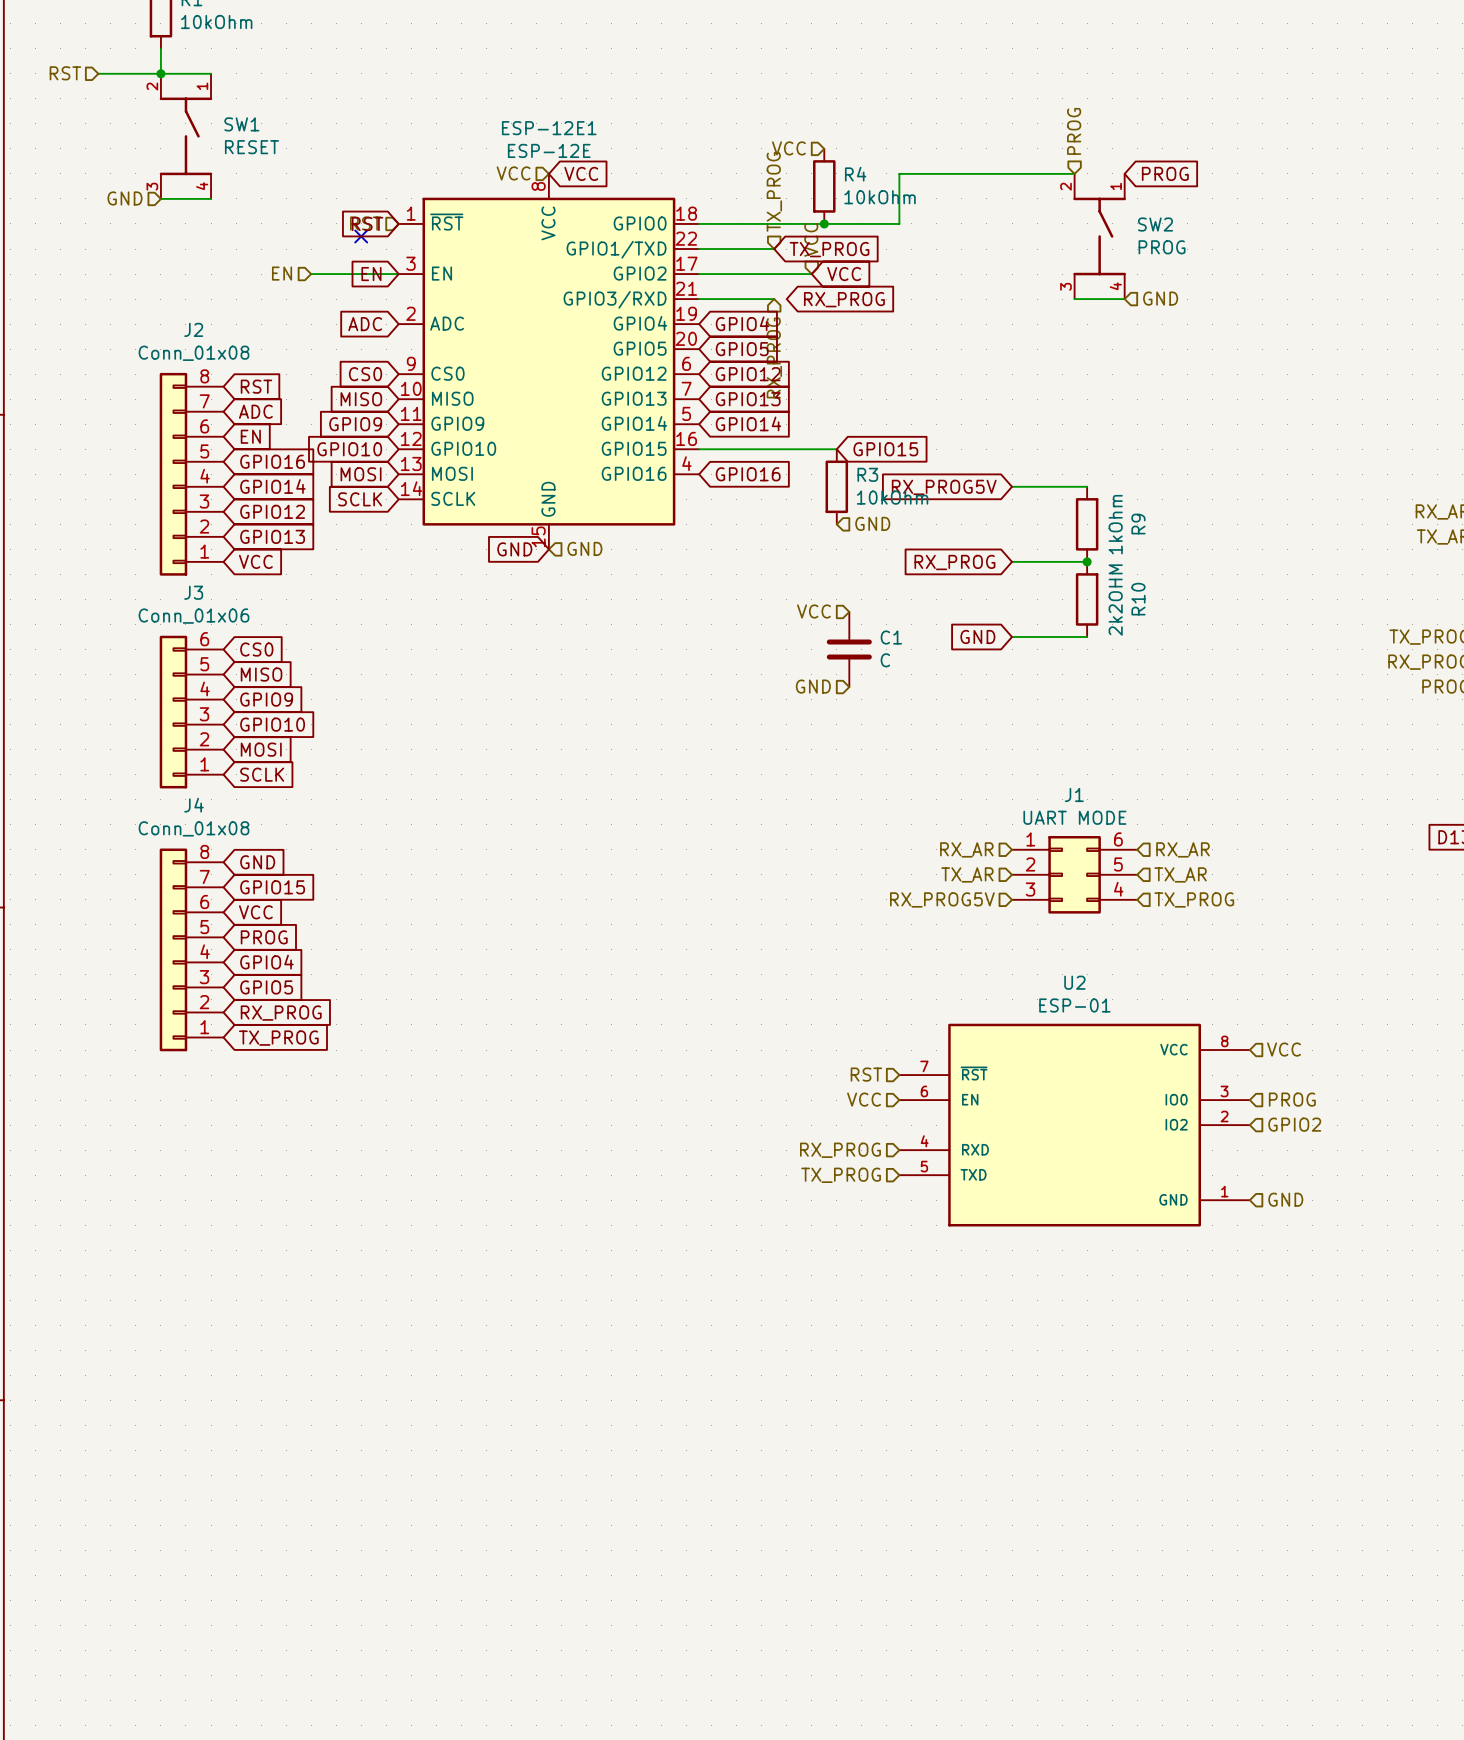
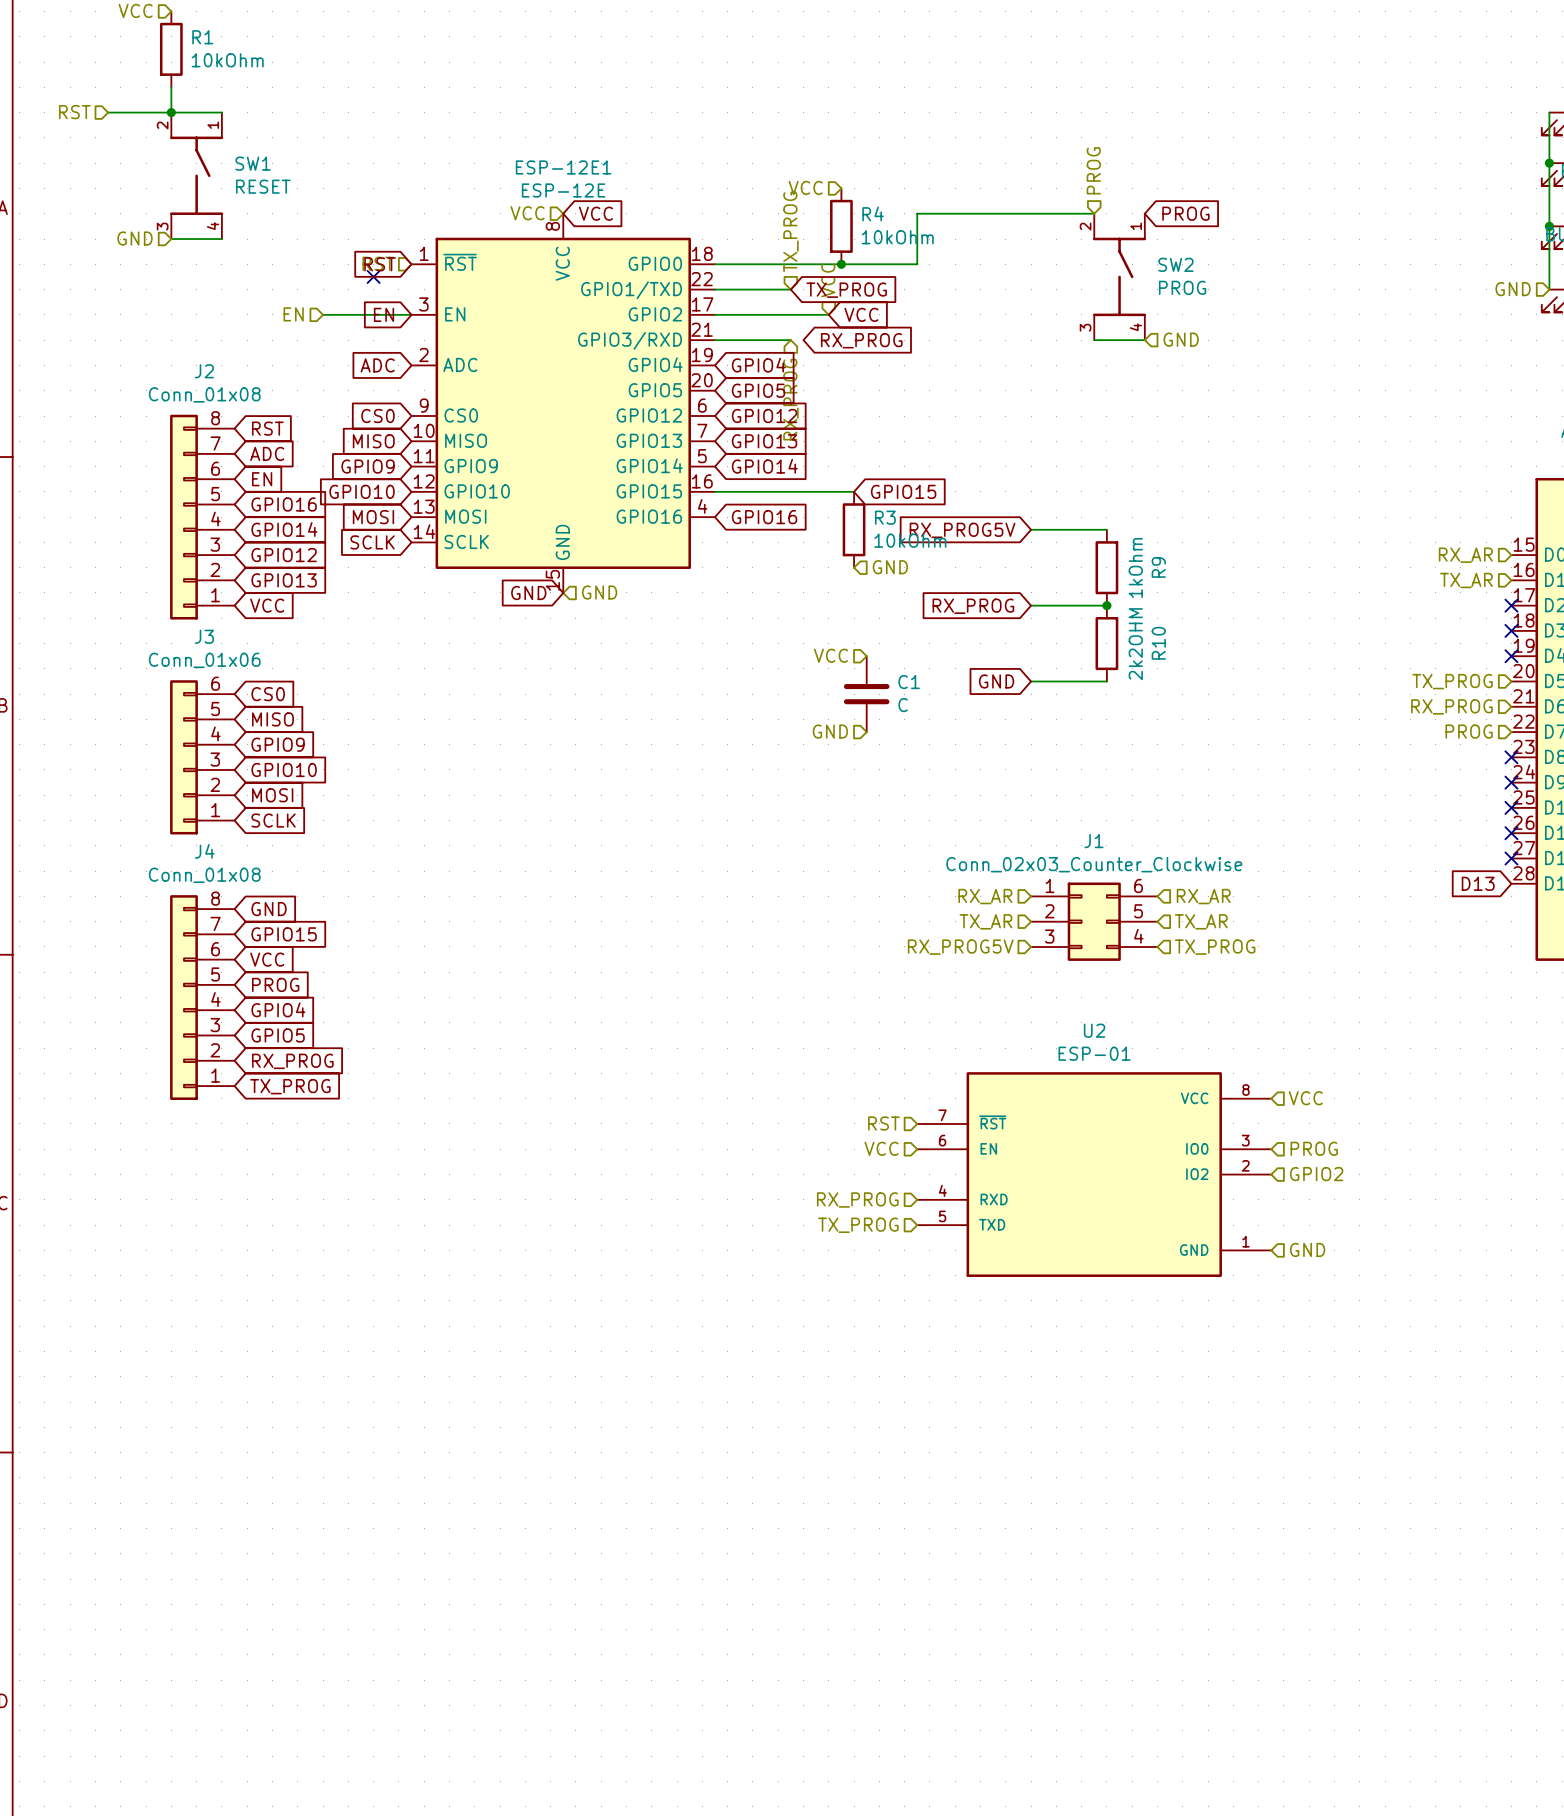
J1 value: UART MODE (1074, 817) -> Conn_02x03_Counter_Clockwise (1094, 864)

